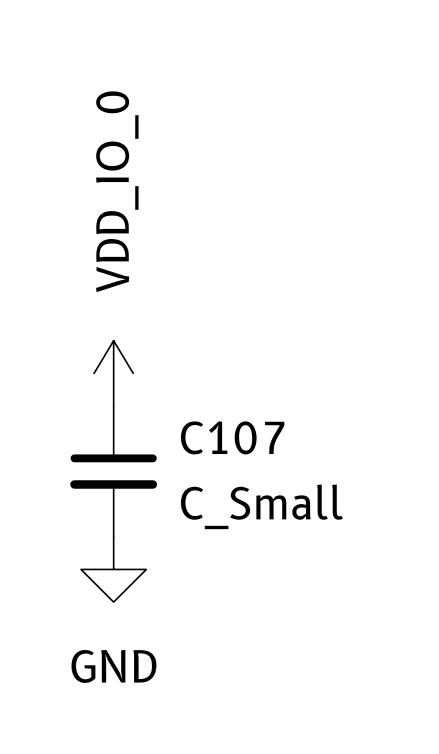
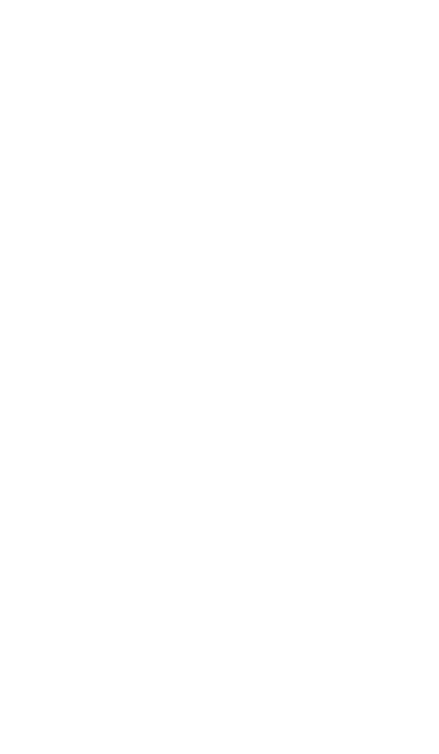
power symbol: VDD_IO_0 (113, 373) -> none
C107: C_Small (113, 471) -> none
power symbol: GND (113, 569) -> none

